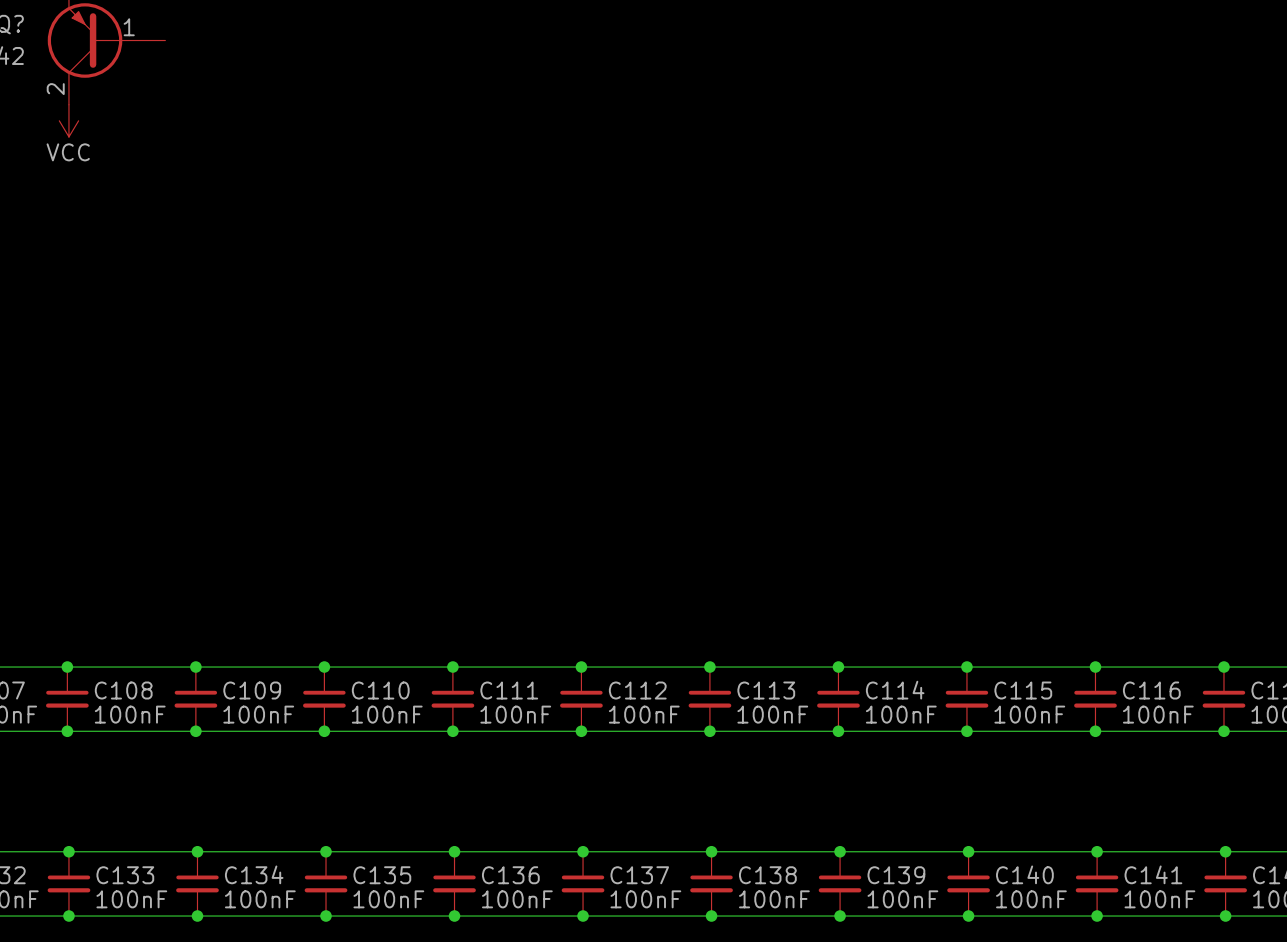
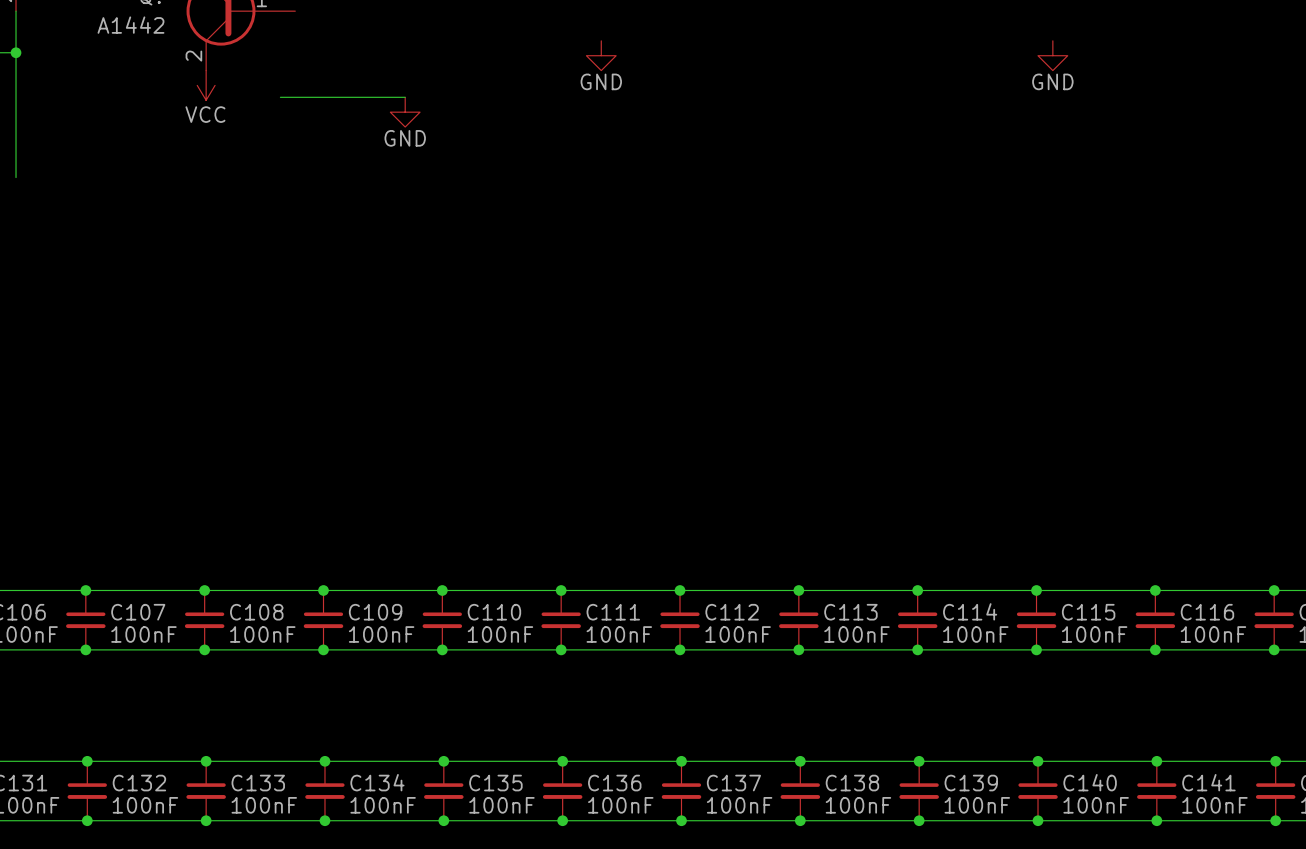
power symbol: none -> GND (601, 55)
power symbol: none -> GND (1052, 55)
wire: none -> (280, 97) (405, 97)
power symbol: none -> GND (405, 112)

